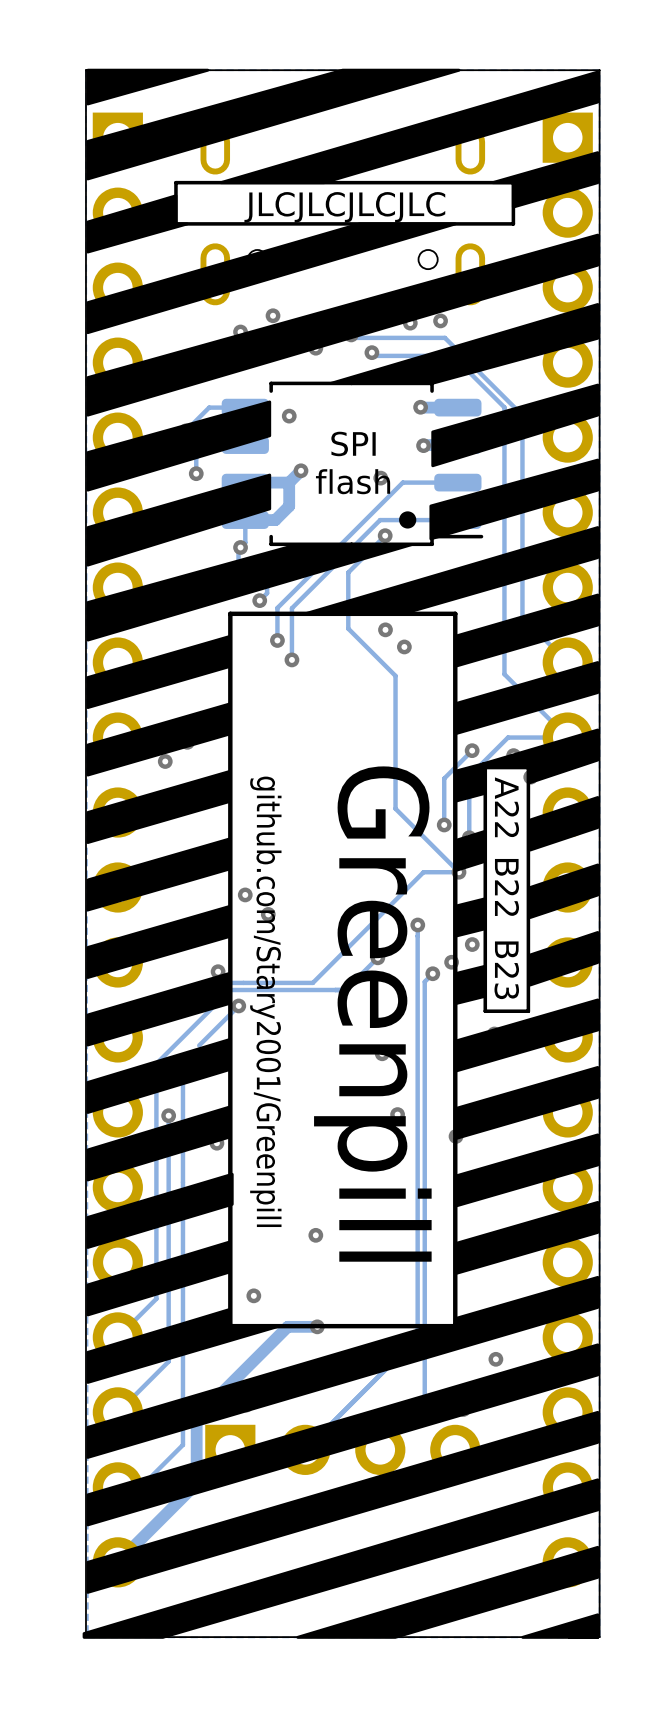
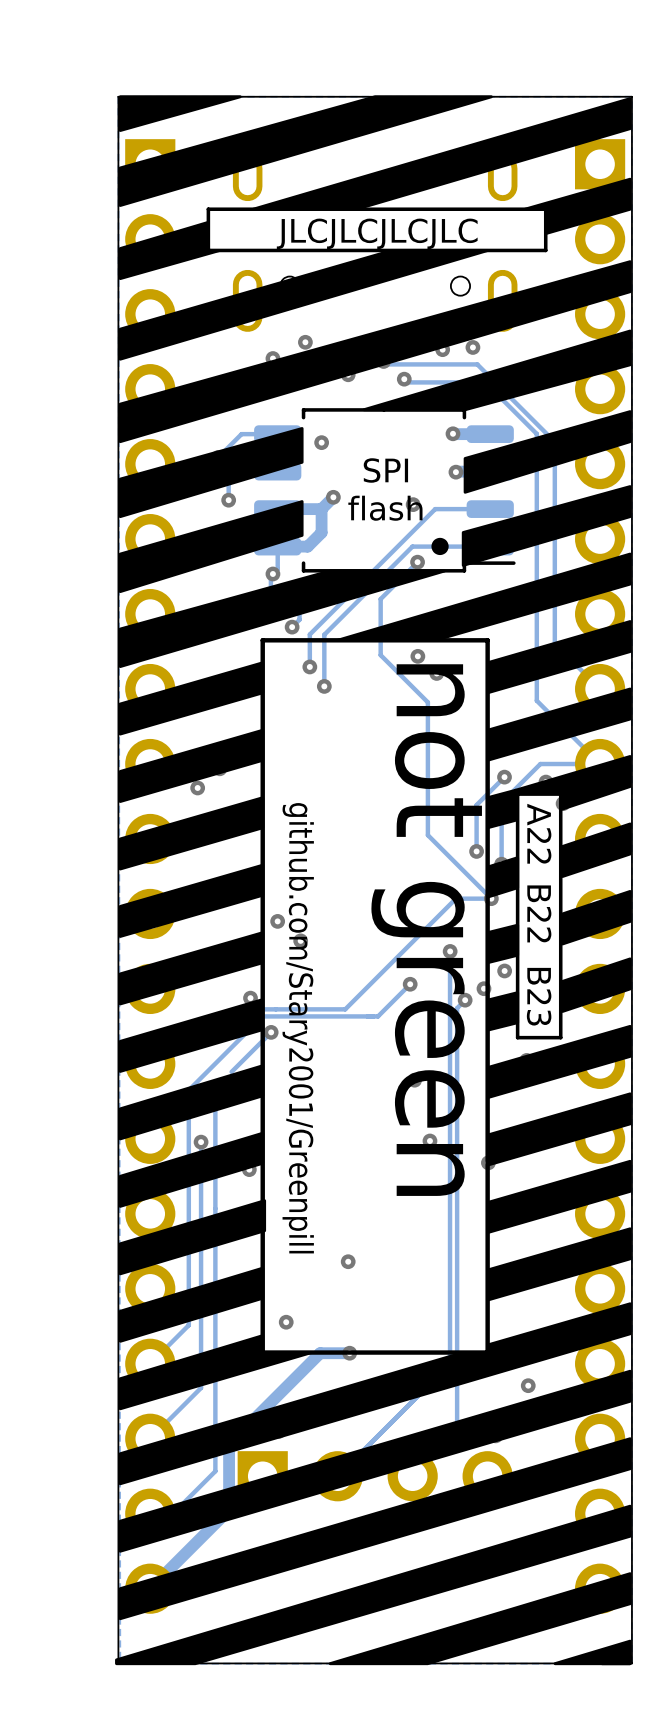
text: none -> not green (426, 930)
text: Greenpill (372, 1014) -> none

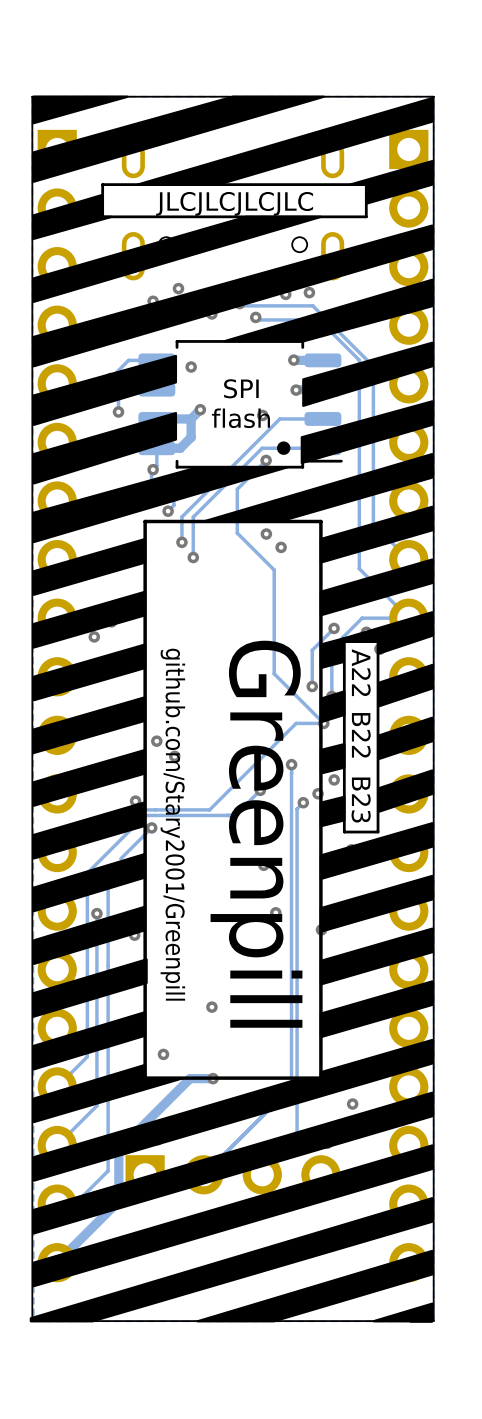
text: not green (426, 930) -> none
text: none -> Greenpill (256, 834)

